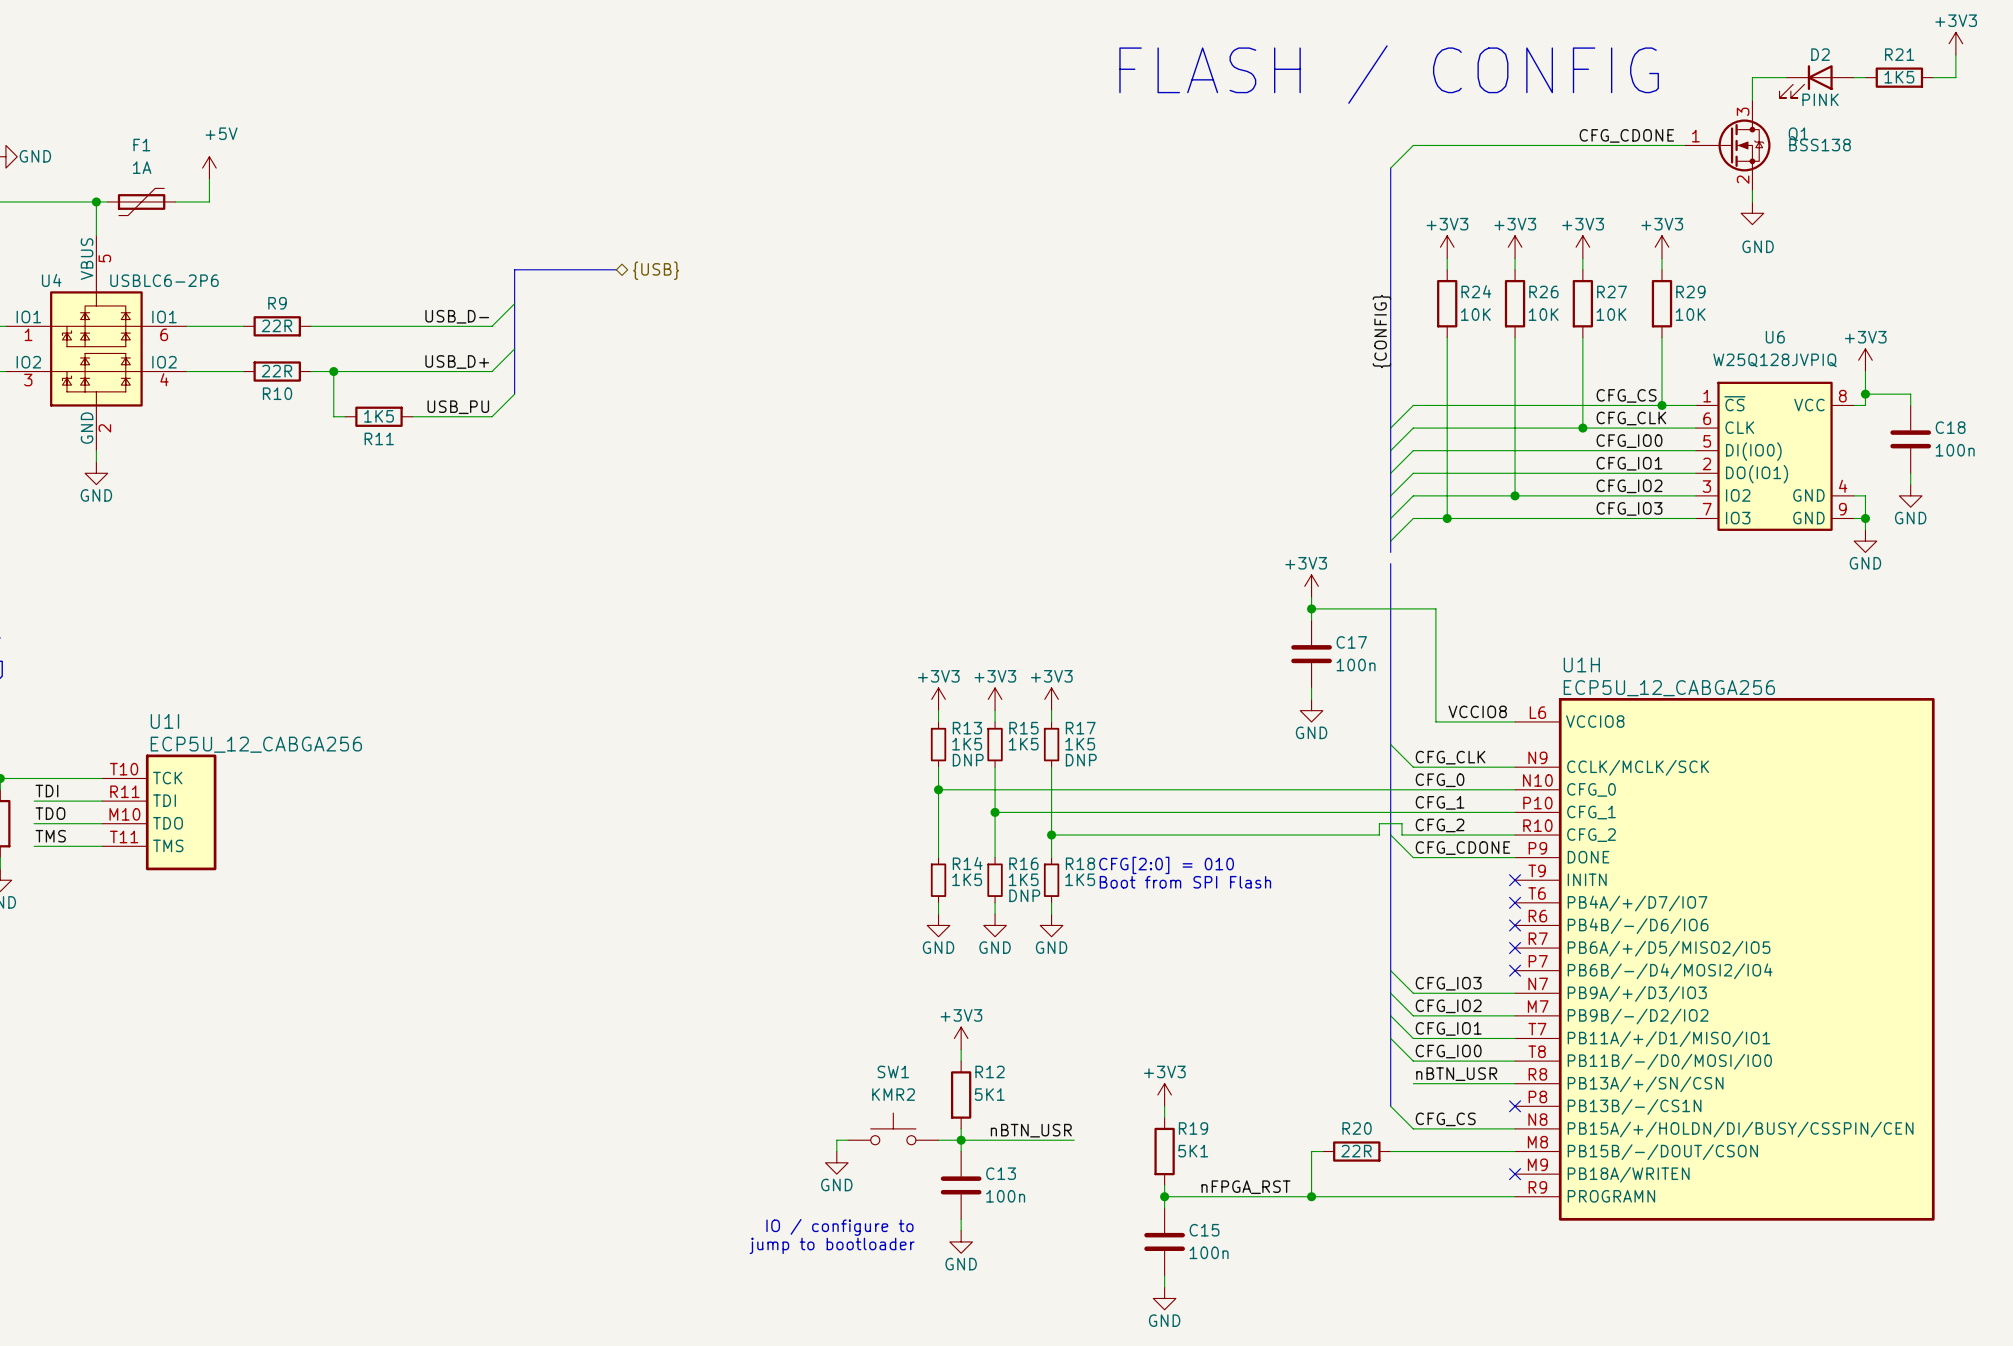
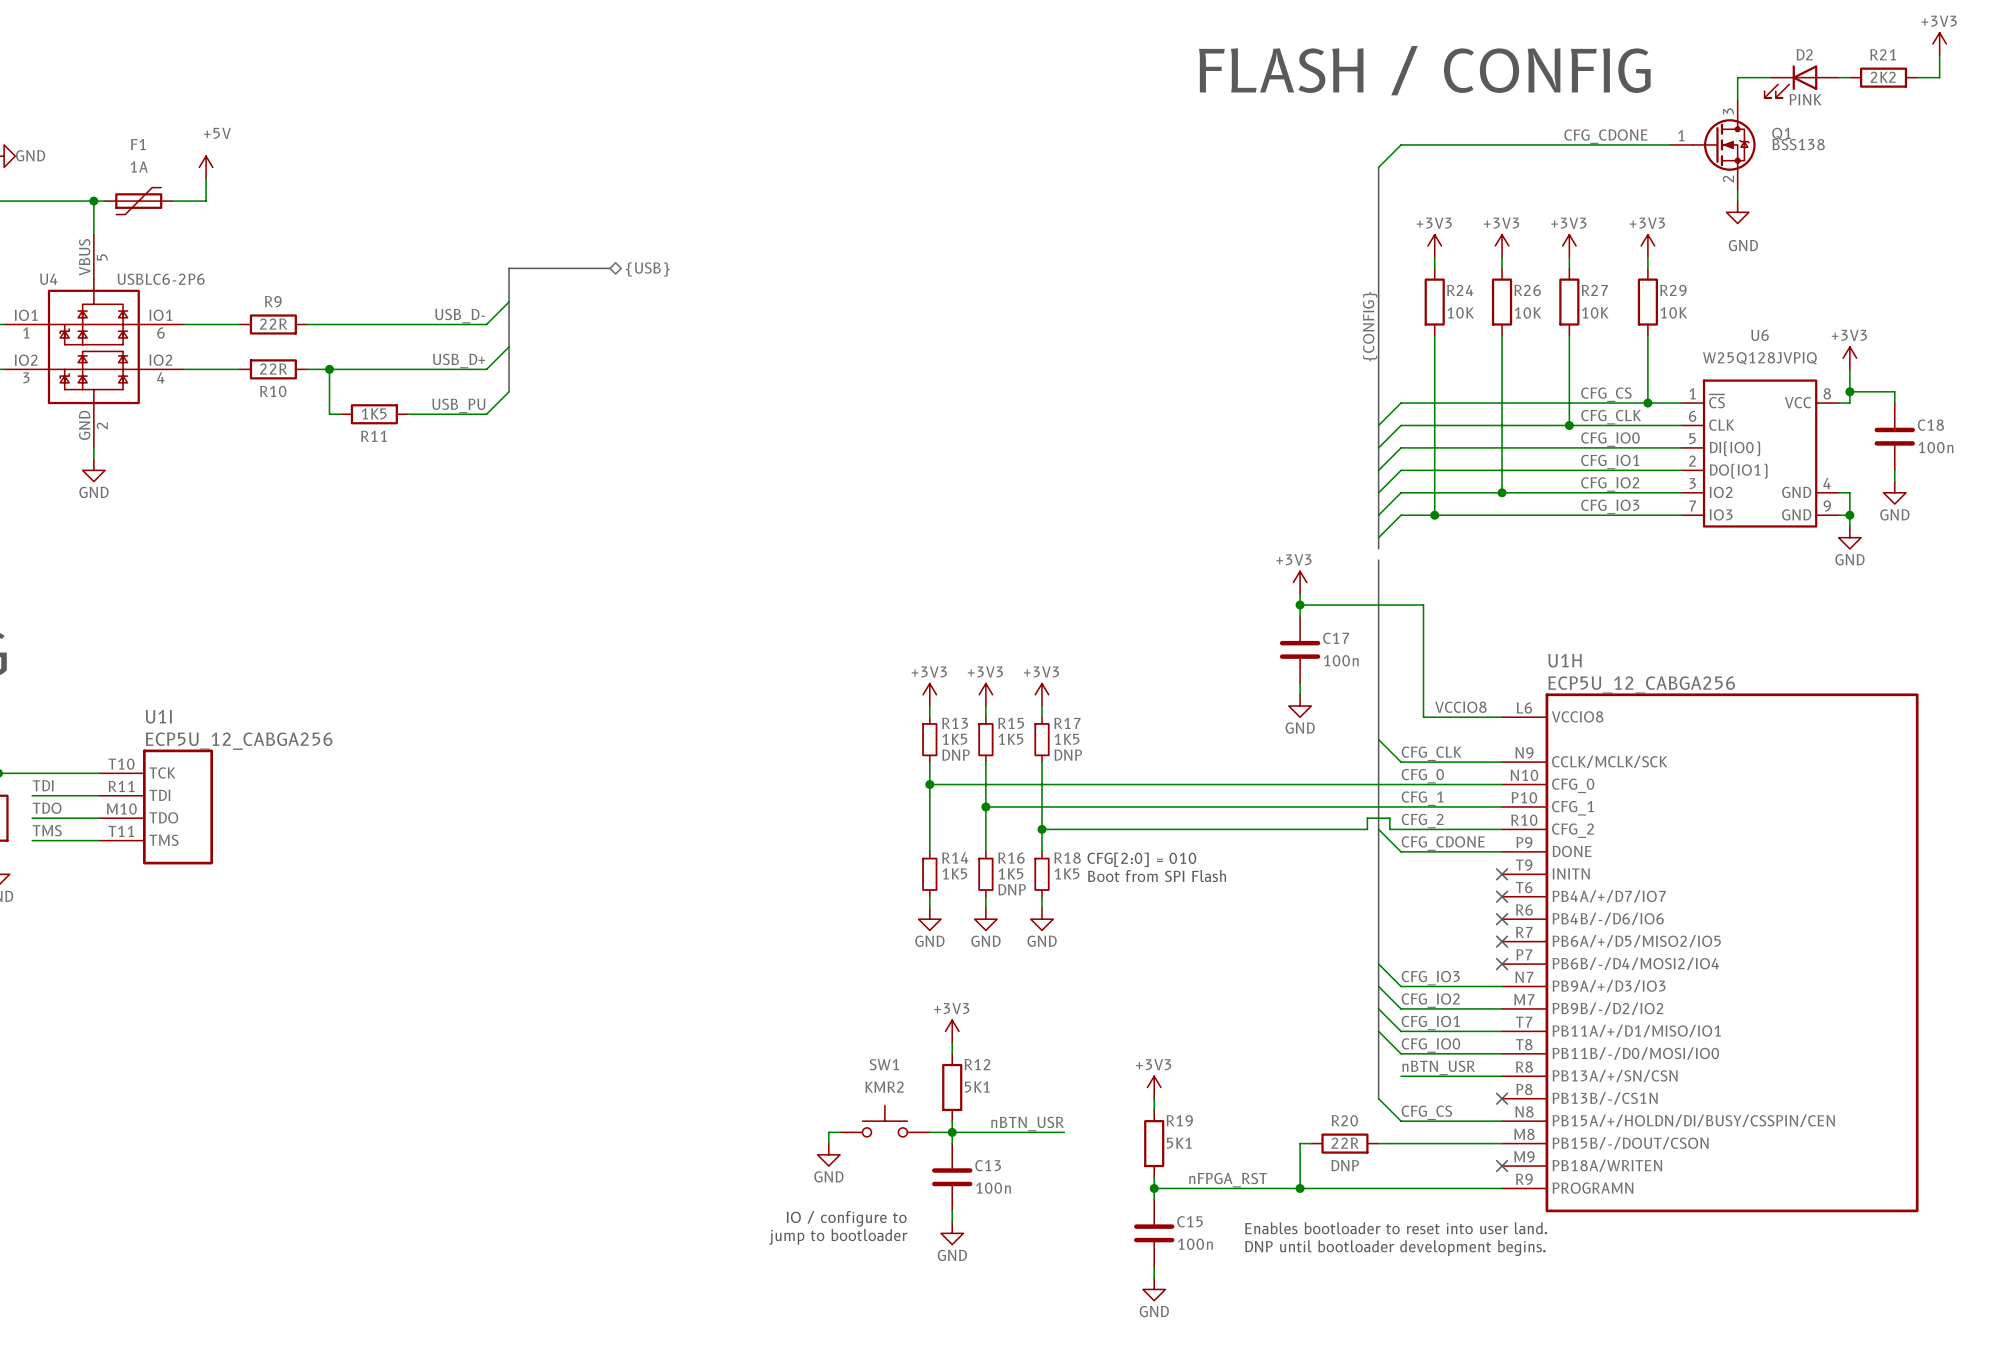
R21 value: 1K5 (1899, 77) -> 2K2 (1883, 77)
R20 text: none -> DNP (1345, 1165)
text: none -> Enables bootloader to reset into user land. (1396, 1228)
text: none -> DNP until bootloader development begins. (1395, 1248)

